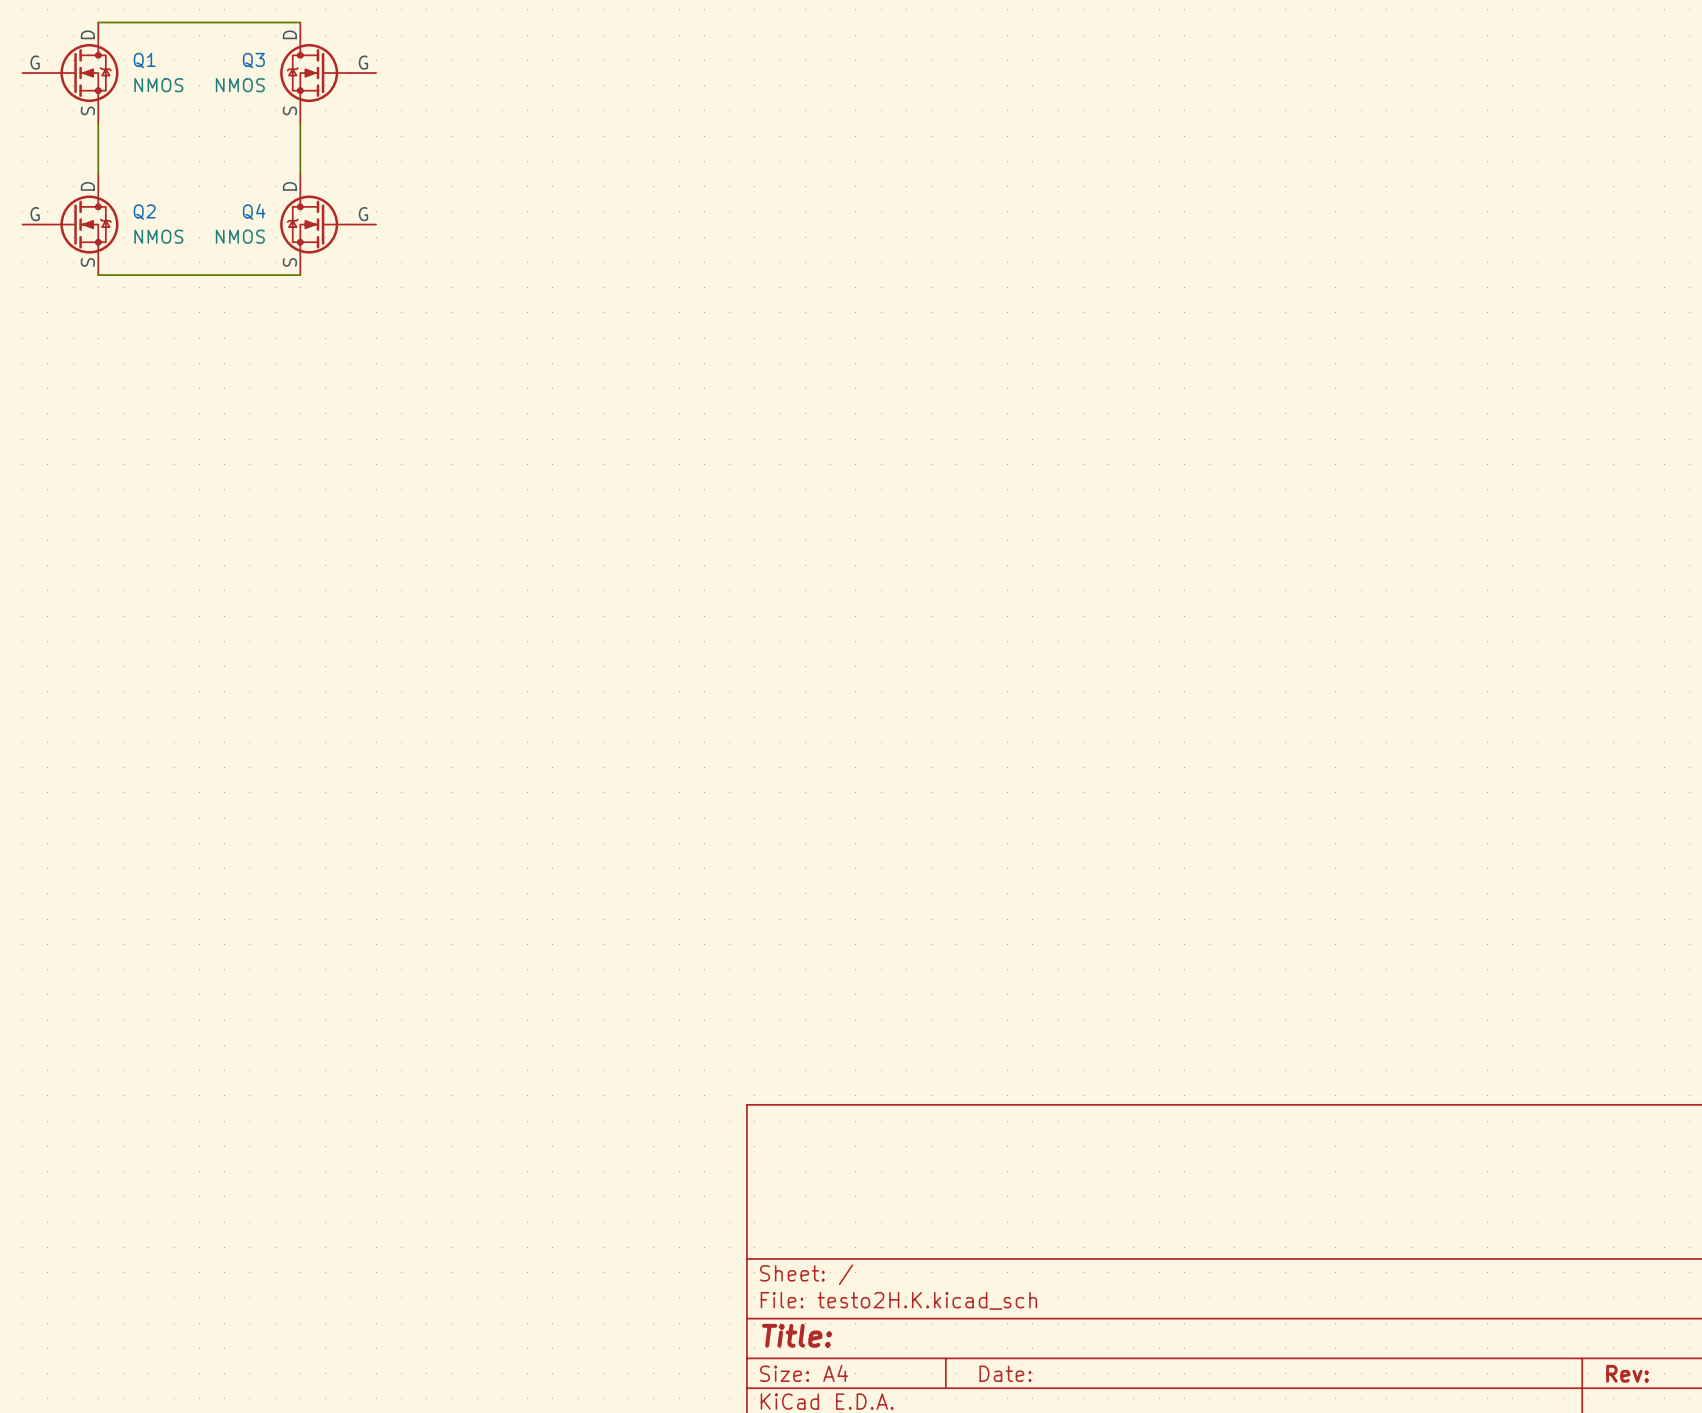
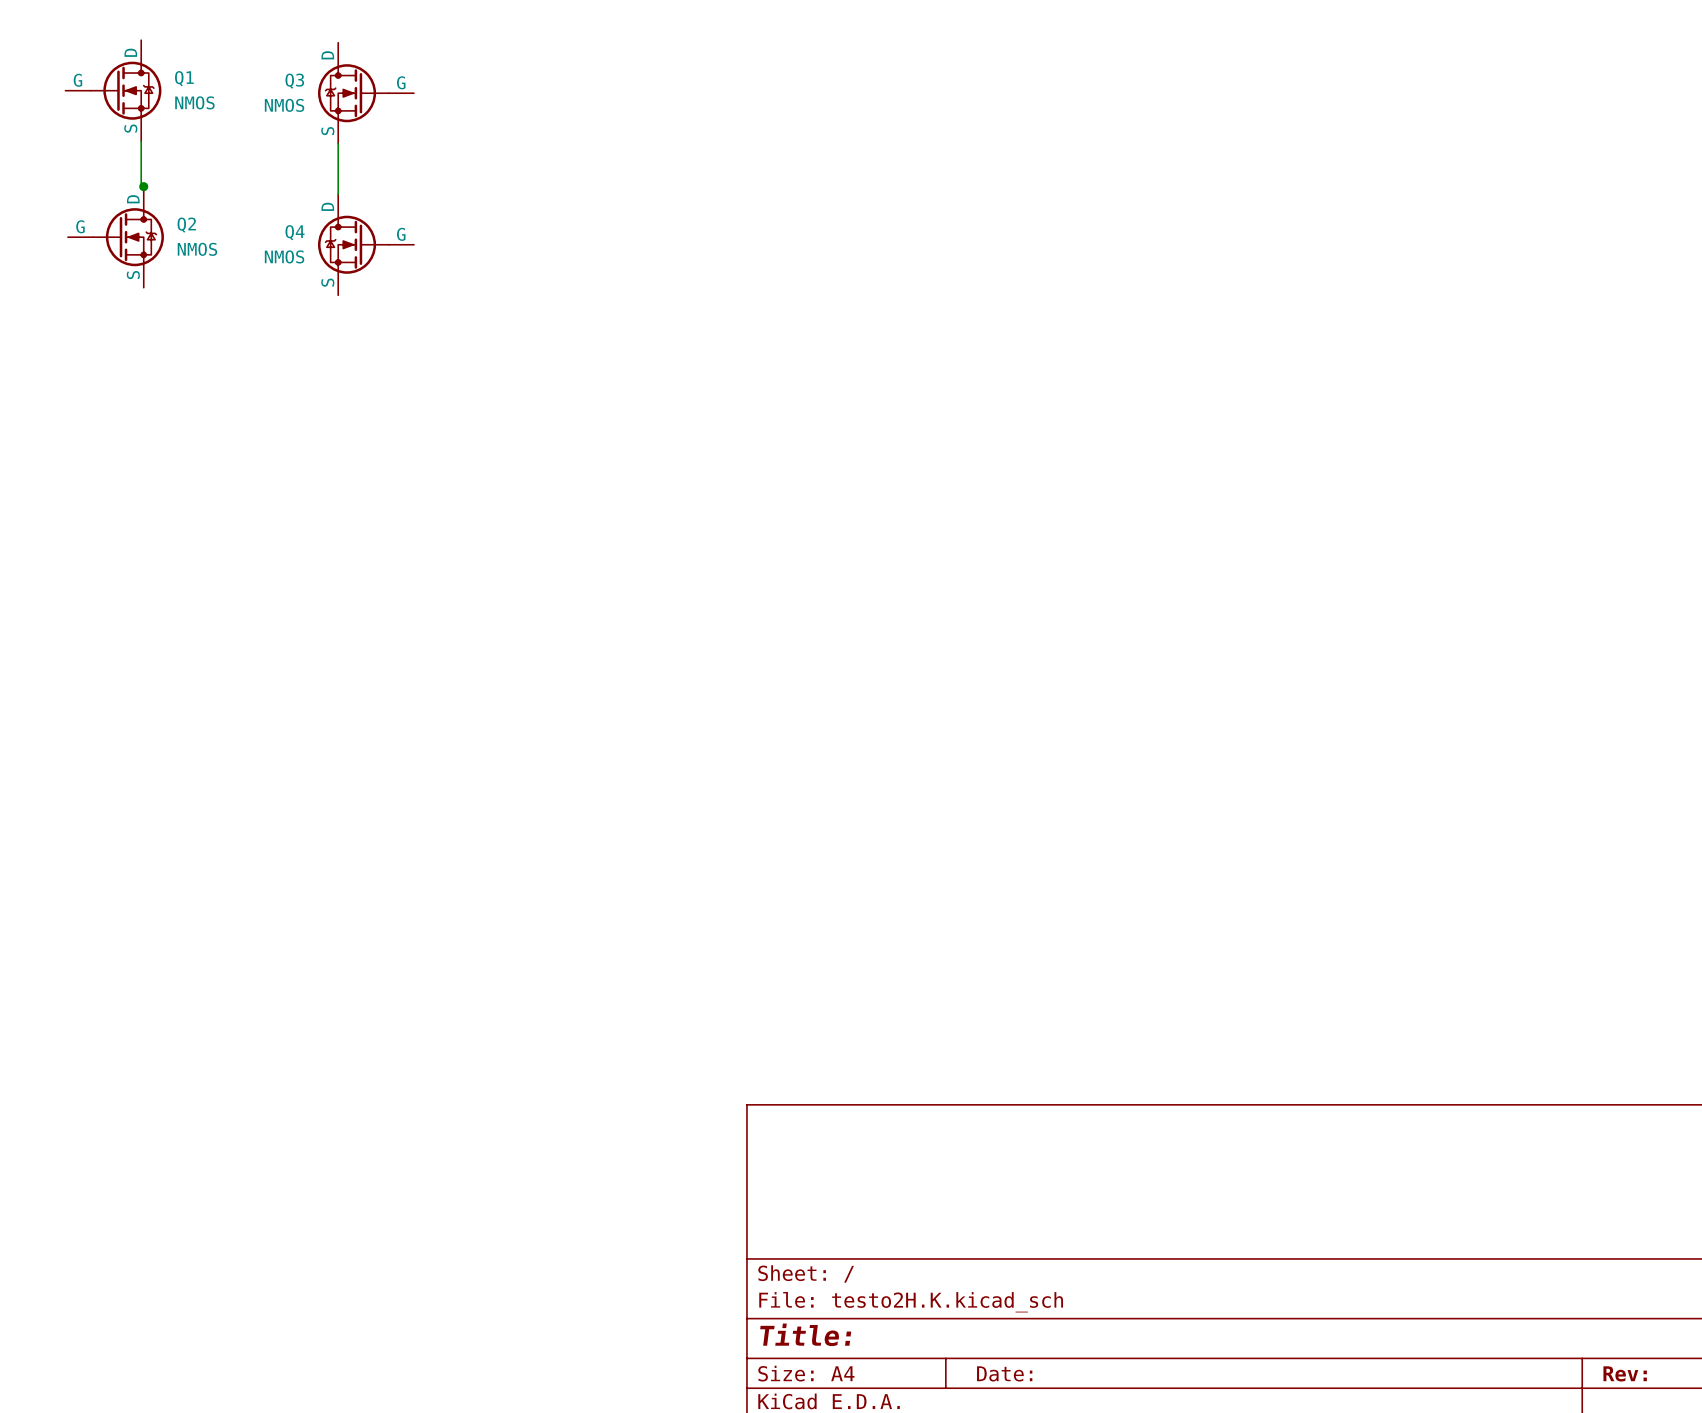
wire: (98, 22) (300, 22) -> none
Q1 position: (70, 73) -> (113, 90)
Q3 position: (328, 73) -> (365, 93)
wire: (98, 123) (98, 174) -> none
wire: (300, 123) (300, 174) -> (338, 143) (338, 194)
wire: none -> (141, 141) (141, 186) (143, 186) (143, 189) (146, 189) (146, 186)
junction: none -> (143, 186)
Q2 position: (70, 224) -> (115, 237)
Q4 position: (328, 224) -> (365, 244)
wire: (98, 275) (300, 275) -> none

